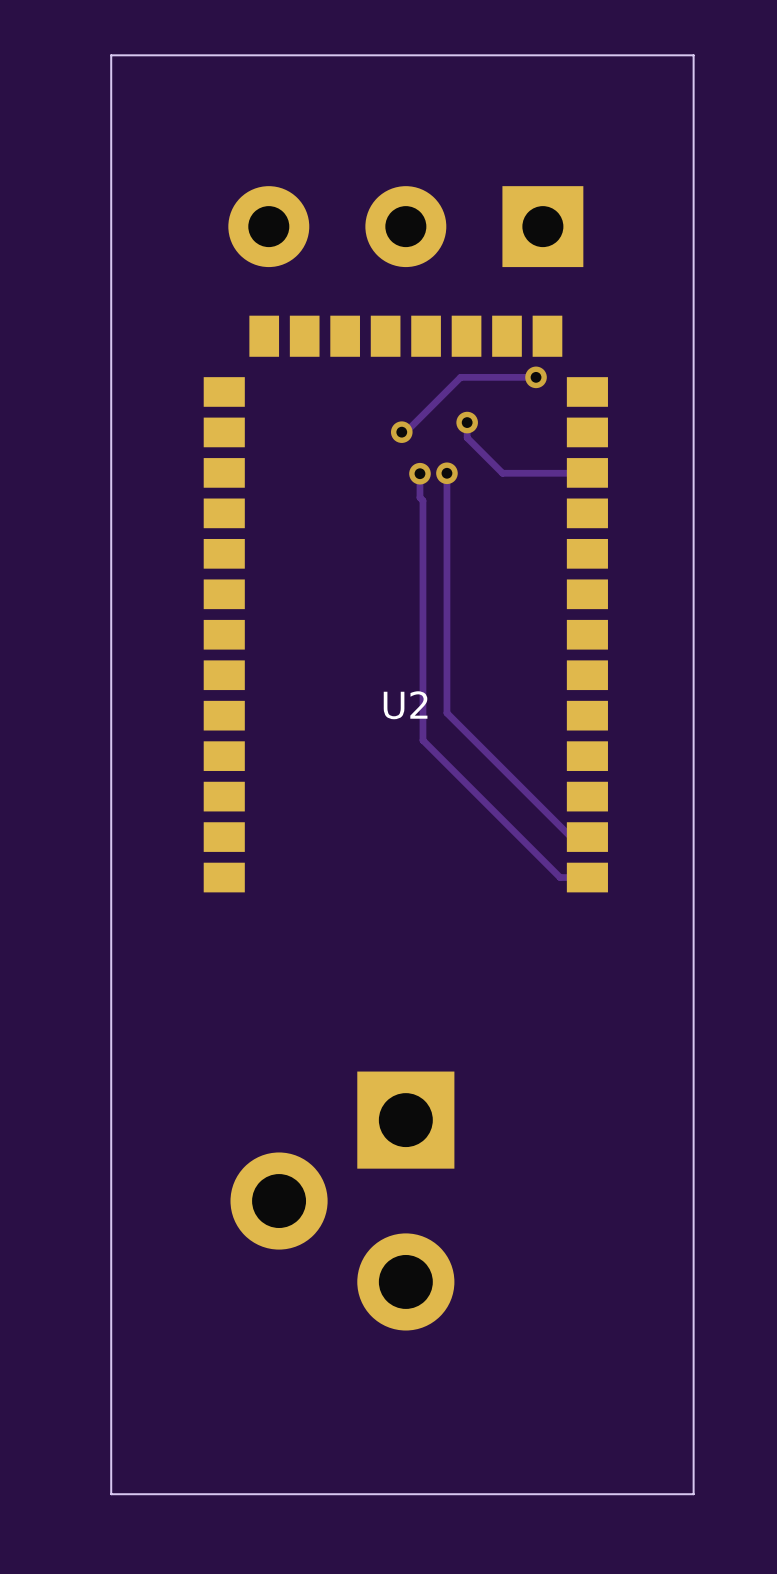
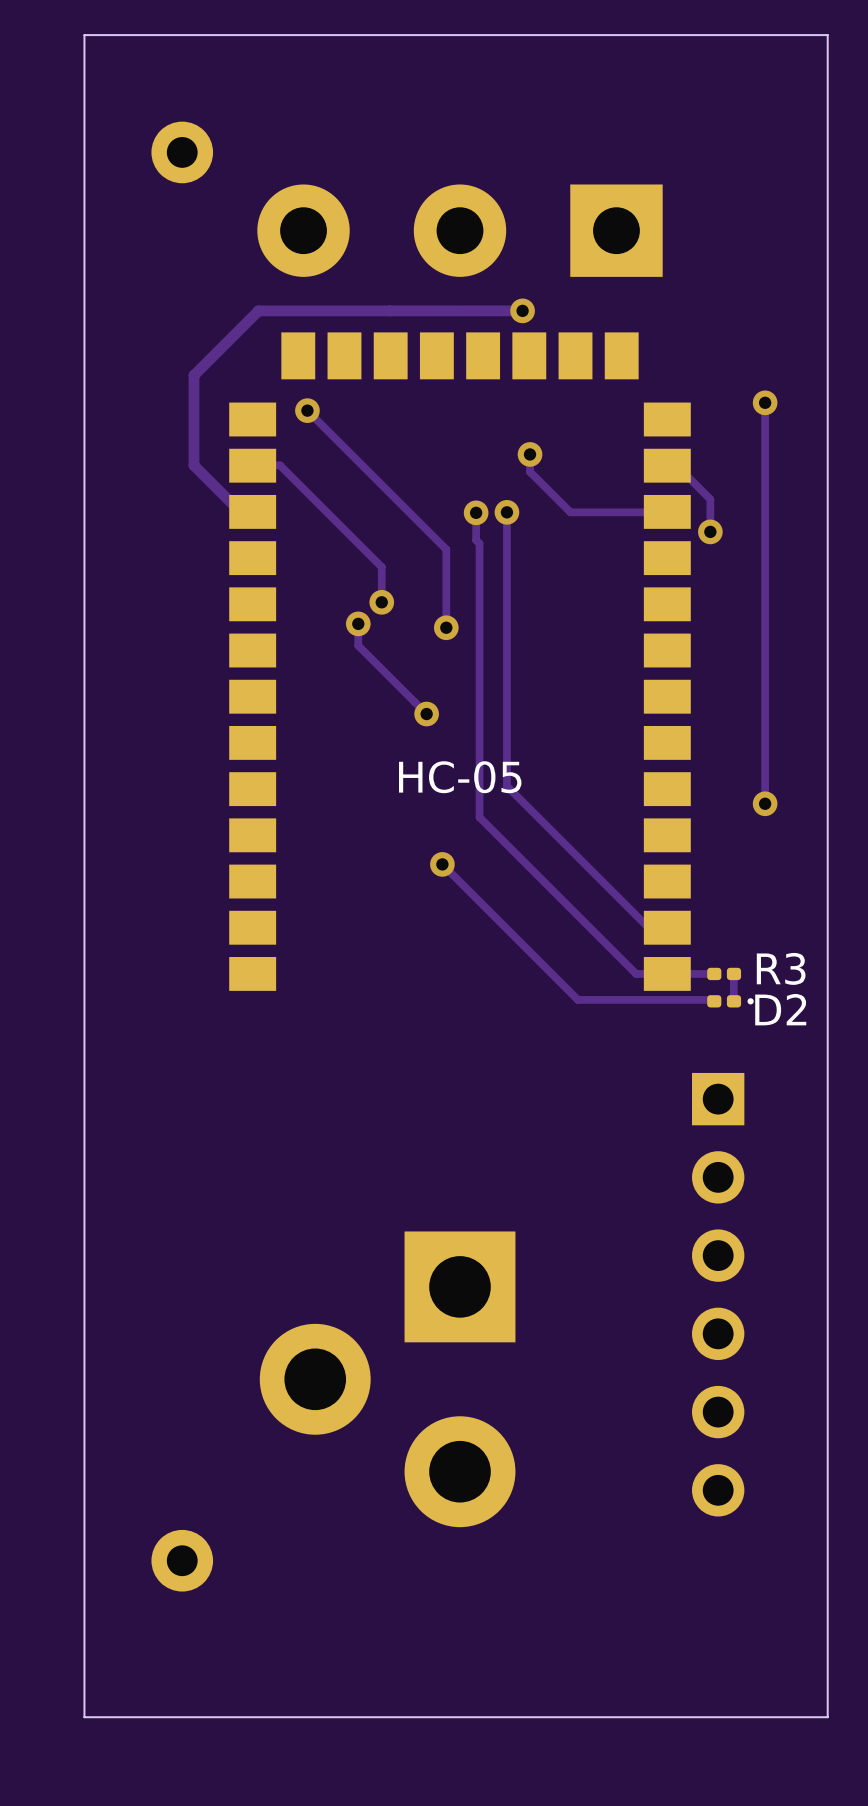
board edge: (693, 55) (693, 1494) (111, 1494) (111, 55) -> (788, 35) (827, 35) (827, 1717) (84, 1717) (84, 35) (123, 35)
part: none -> (182, 152)
track: none -> (522, 310) (258, 310) (193, 375) (193, 465) (240, 512) (248, 512)
via: none -> (522, 310)
track: (536, 377) (460, 377) (405, 432) (401, 432) -> none
via: (536, 377) -> none
track: none -> (765, 402) (765, 803)
via: none -> (765, 402)
track: none -> (307, 410) (446, 549) (446, 627)
via: none -> (307, 410)
track: none -> (264, 465) (280, 465) (381, 567) (381, 602)
via: (401, 432) -> none
track: none -> (669, 467) (678, 467) (710, 499) (710, 531)
via: none -> (710, 531)
via: none -> (381, 602)
track: none -> (358, 623) (358, 645) (426, 714)
via: none -> (358, 623)
via: none -> (446, 627)
via: none -> (426, 714)
U2 name: U2 (405, 705) -> HC-05 (460, 777)
via: none -> (765, 803)
track: none -> (442, 864) (577, 999) (710, 999)
via: none -> (442, 864)
track: none -> (714, 973) (682, 973)
R3: none -> (724, 973)
track: none -> (733, 973) (733, 999)
D2: none -> (730, 1001)
part: none -> (718, 1294)
part position: (342, 1201) -> (387, 1379)
part: none -> (182, 1560)

